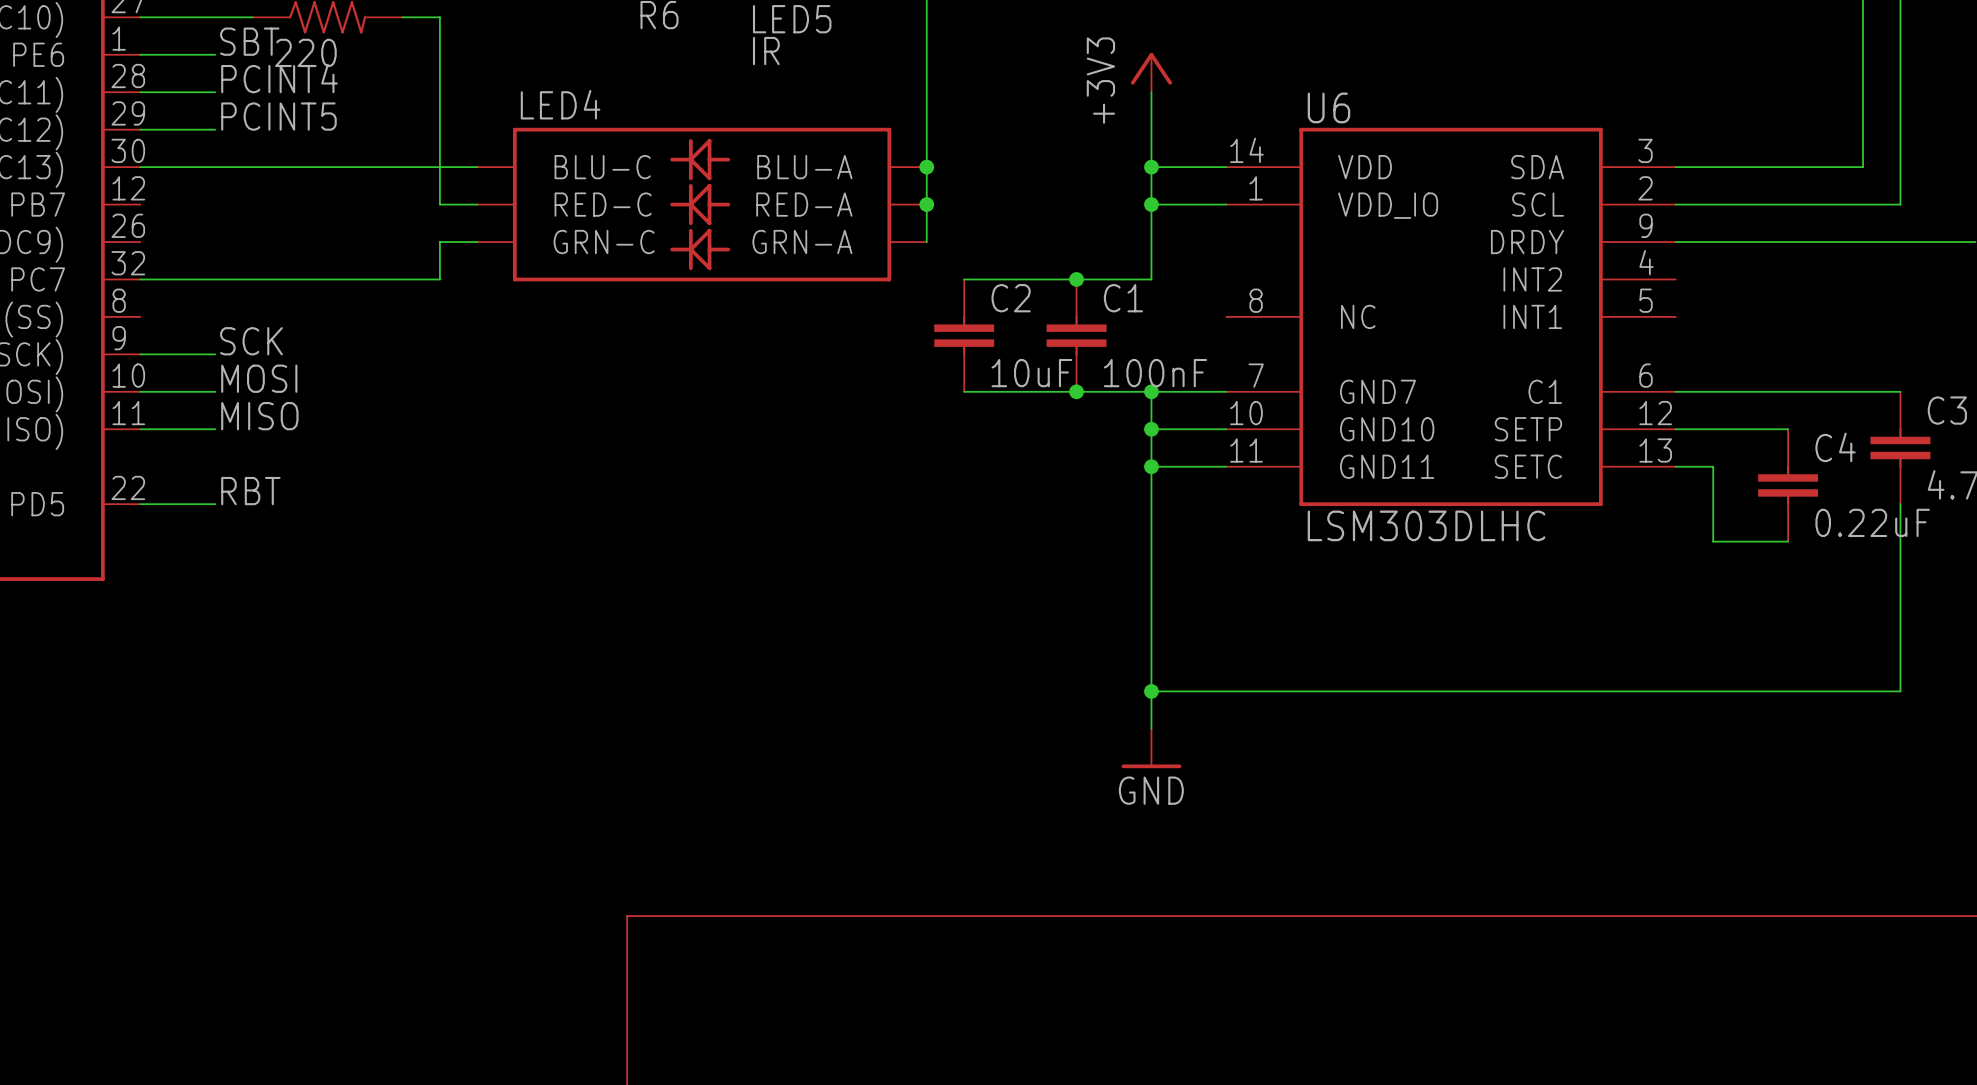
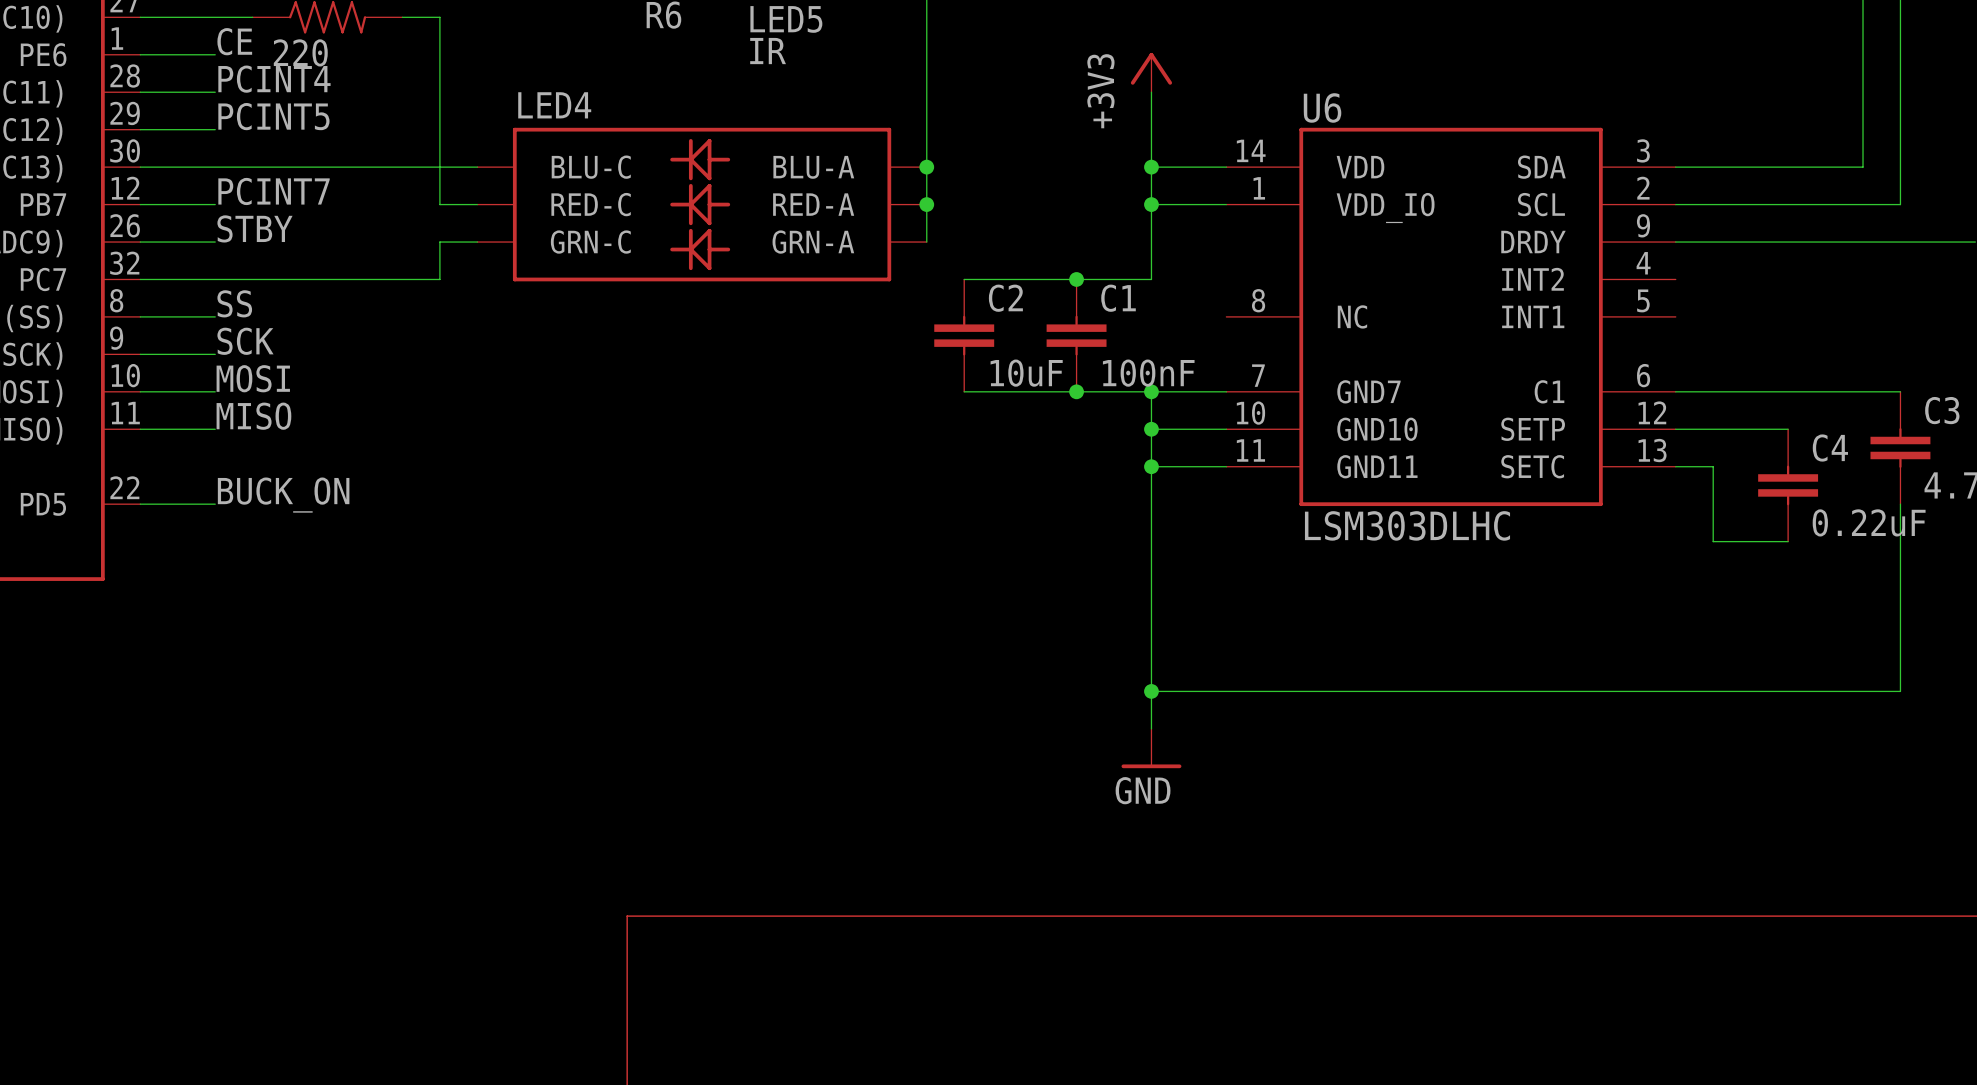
label: SBT (249, 41) -> CE (234, 41)
label: none -> PCINT7 (274, 191)
wire: none -> (140, 204) (215, 204)
label: none -> STBY (254, 228)
wire: none -> (140, 242) (215, 242)
label: none -> SS (234, 303)
wire: none -> (140, 316) (215, 316)
label: RBT (250, 491) -> BUCK_ON (283, 495)

